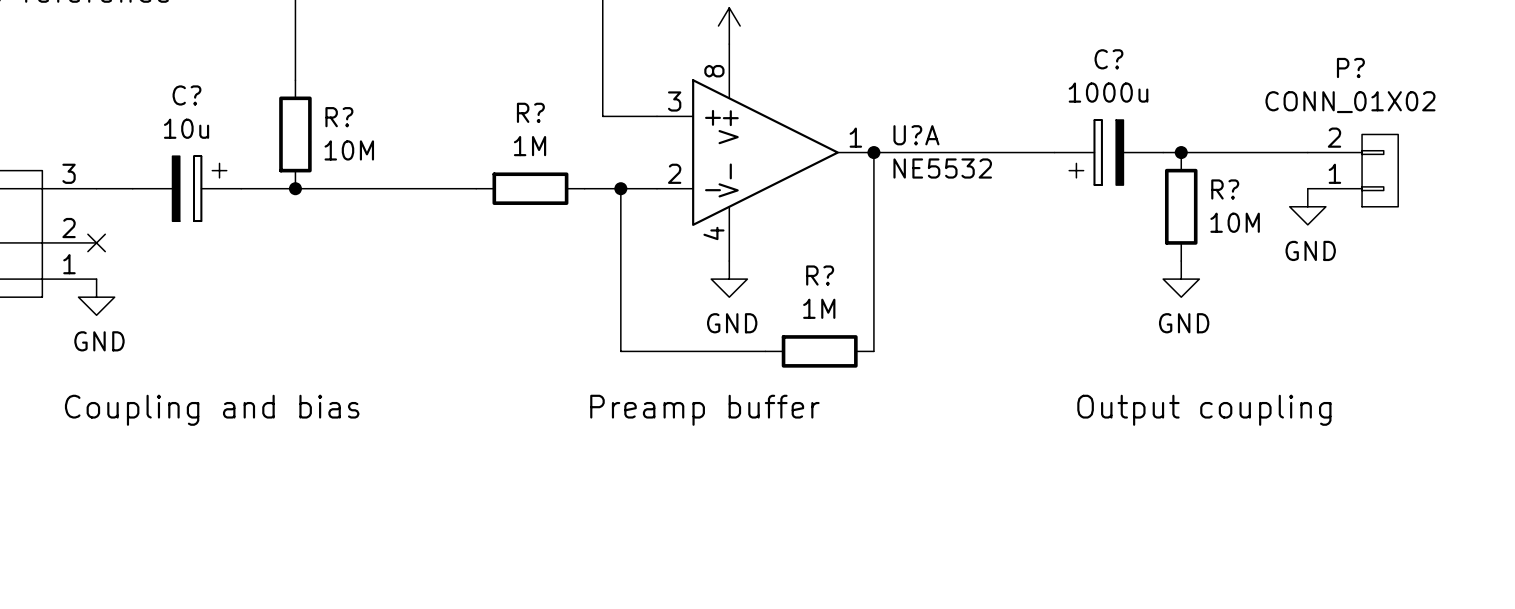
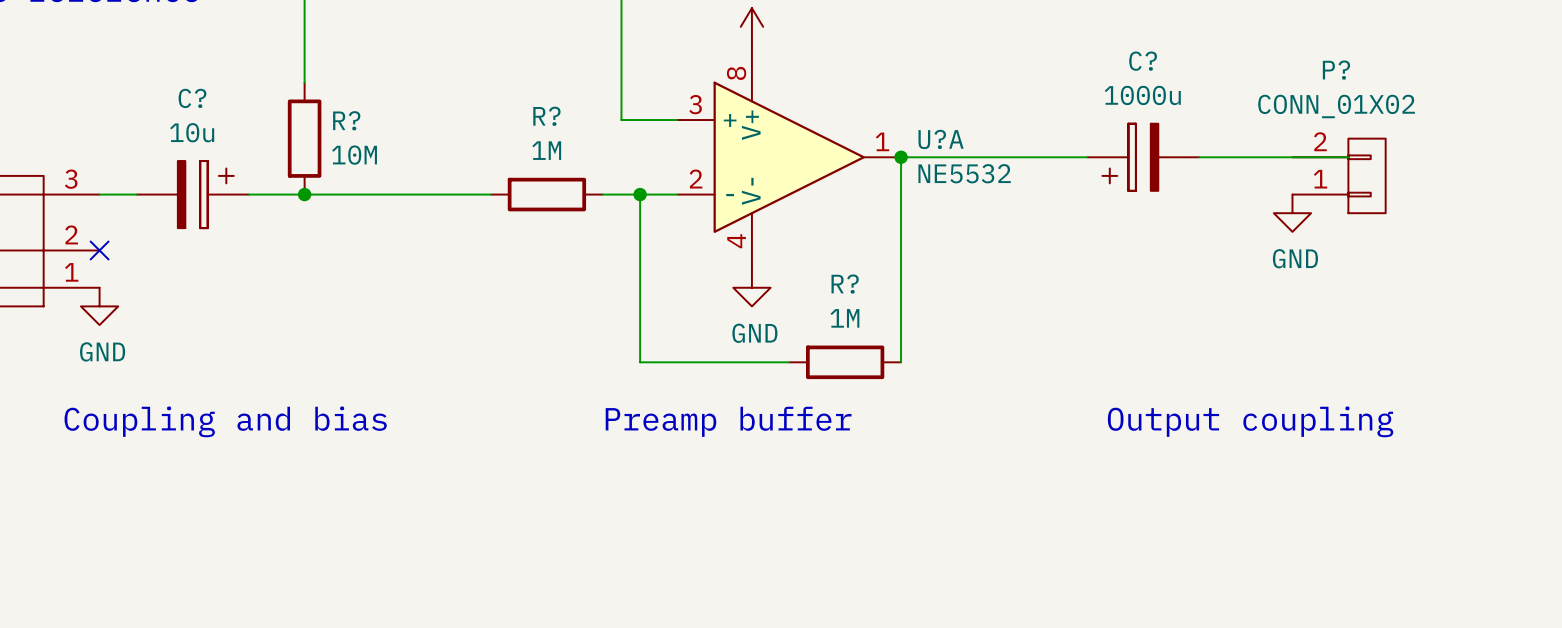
junction: (1181, 152) -> none
P? position: (1353, 170) -> (1339, 175)
R?: 10M (1181, 206) -> none
power symbol: none -> GND (1292, 213)
power symbol: GND (1307, 206) -> none
power symbol: GND (1181, 279) -> none

